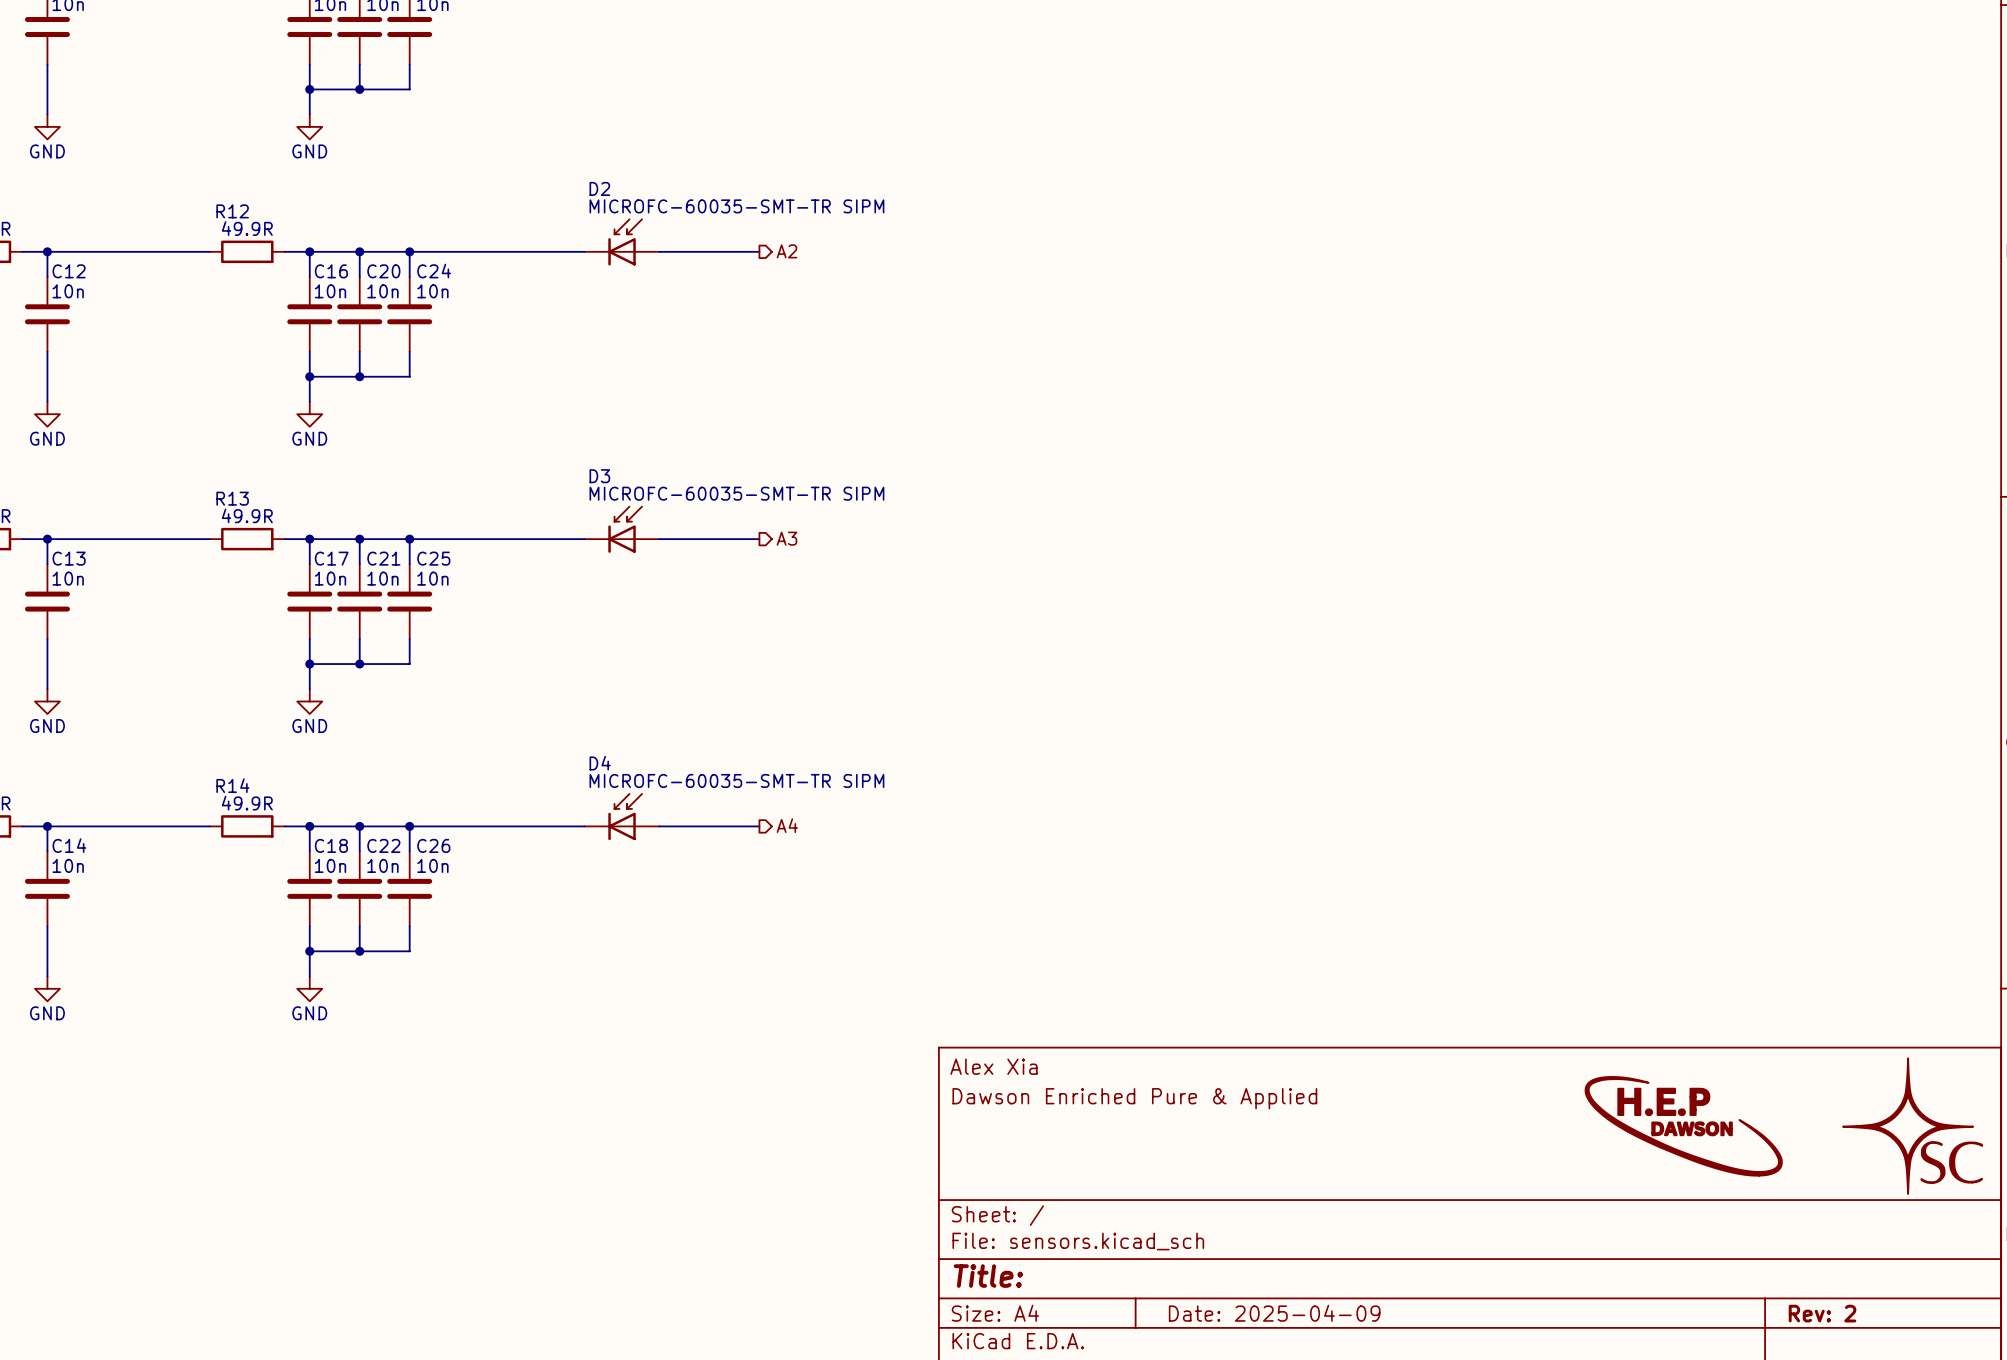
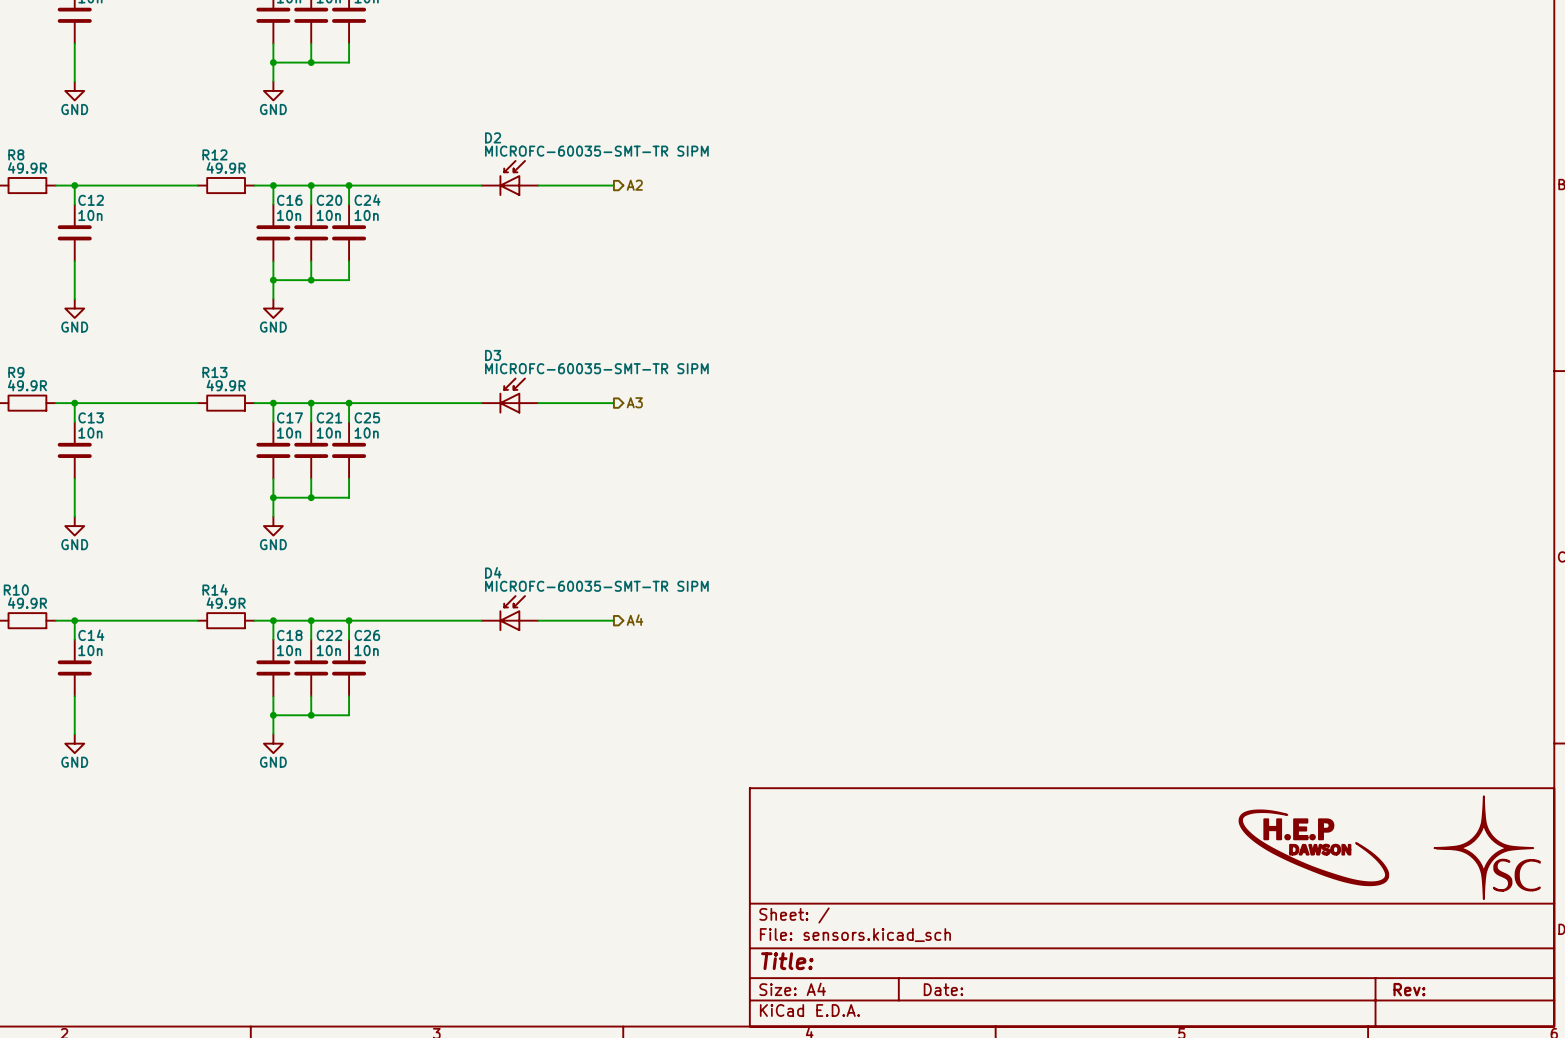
title block: Alex Xia (994, 1066) -> none
title block: Dawson Enriched Pure & Applied (1134, 1098) -> none
title block: Date: 2025-04-09 (1274, 1313) -> Date: (943, 989)
title block: Rev: 2 (1822, 1313) -> Rev: (1409, 989)

